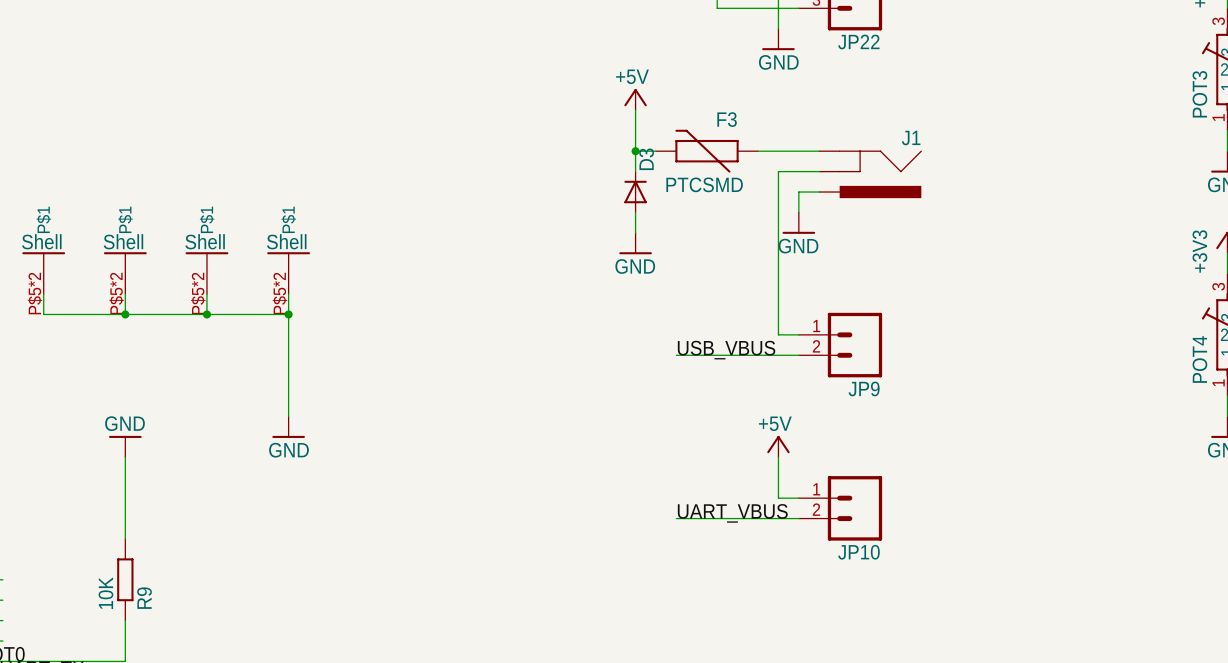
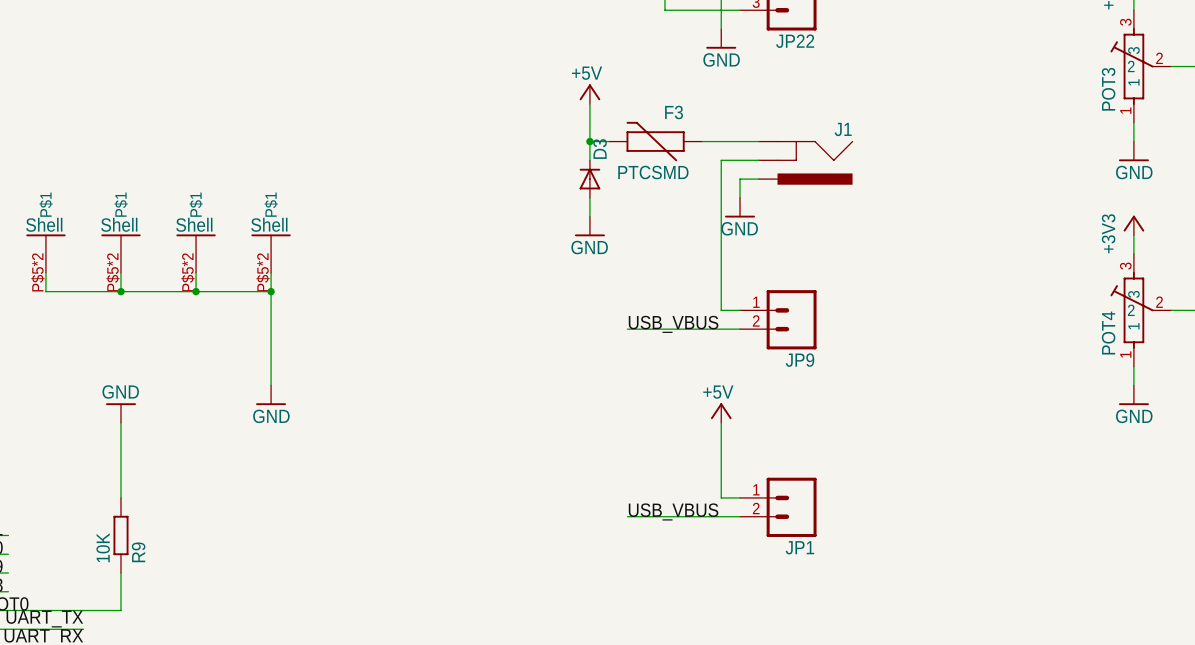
wire: (778, 498) (798, 498) -> (721, 460) (721, 497) (740, 497)
JP10: (840, 508) -> none
label: UART_VBUS (732, 513) -> none
wire: (676, 518) (798, 518) -> (627, 516) (740, 516)
JP1: none -> (778, 507)
label: none -> USB_VBUS (673, 511)

